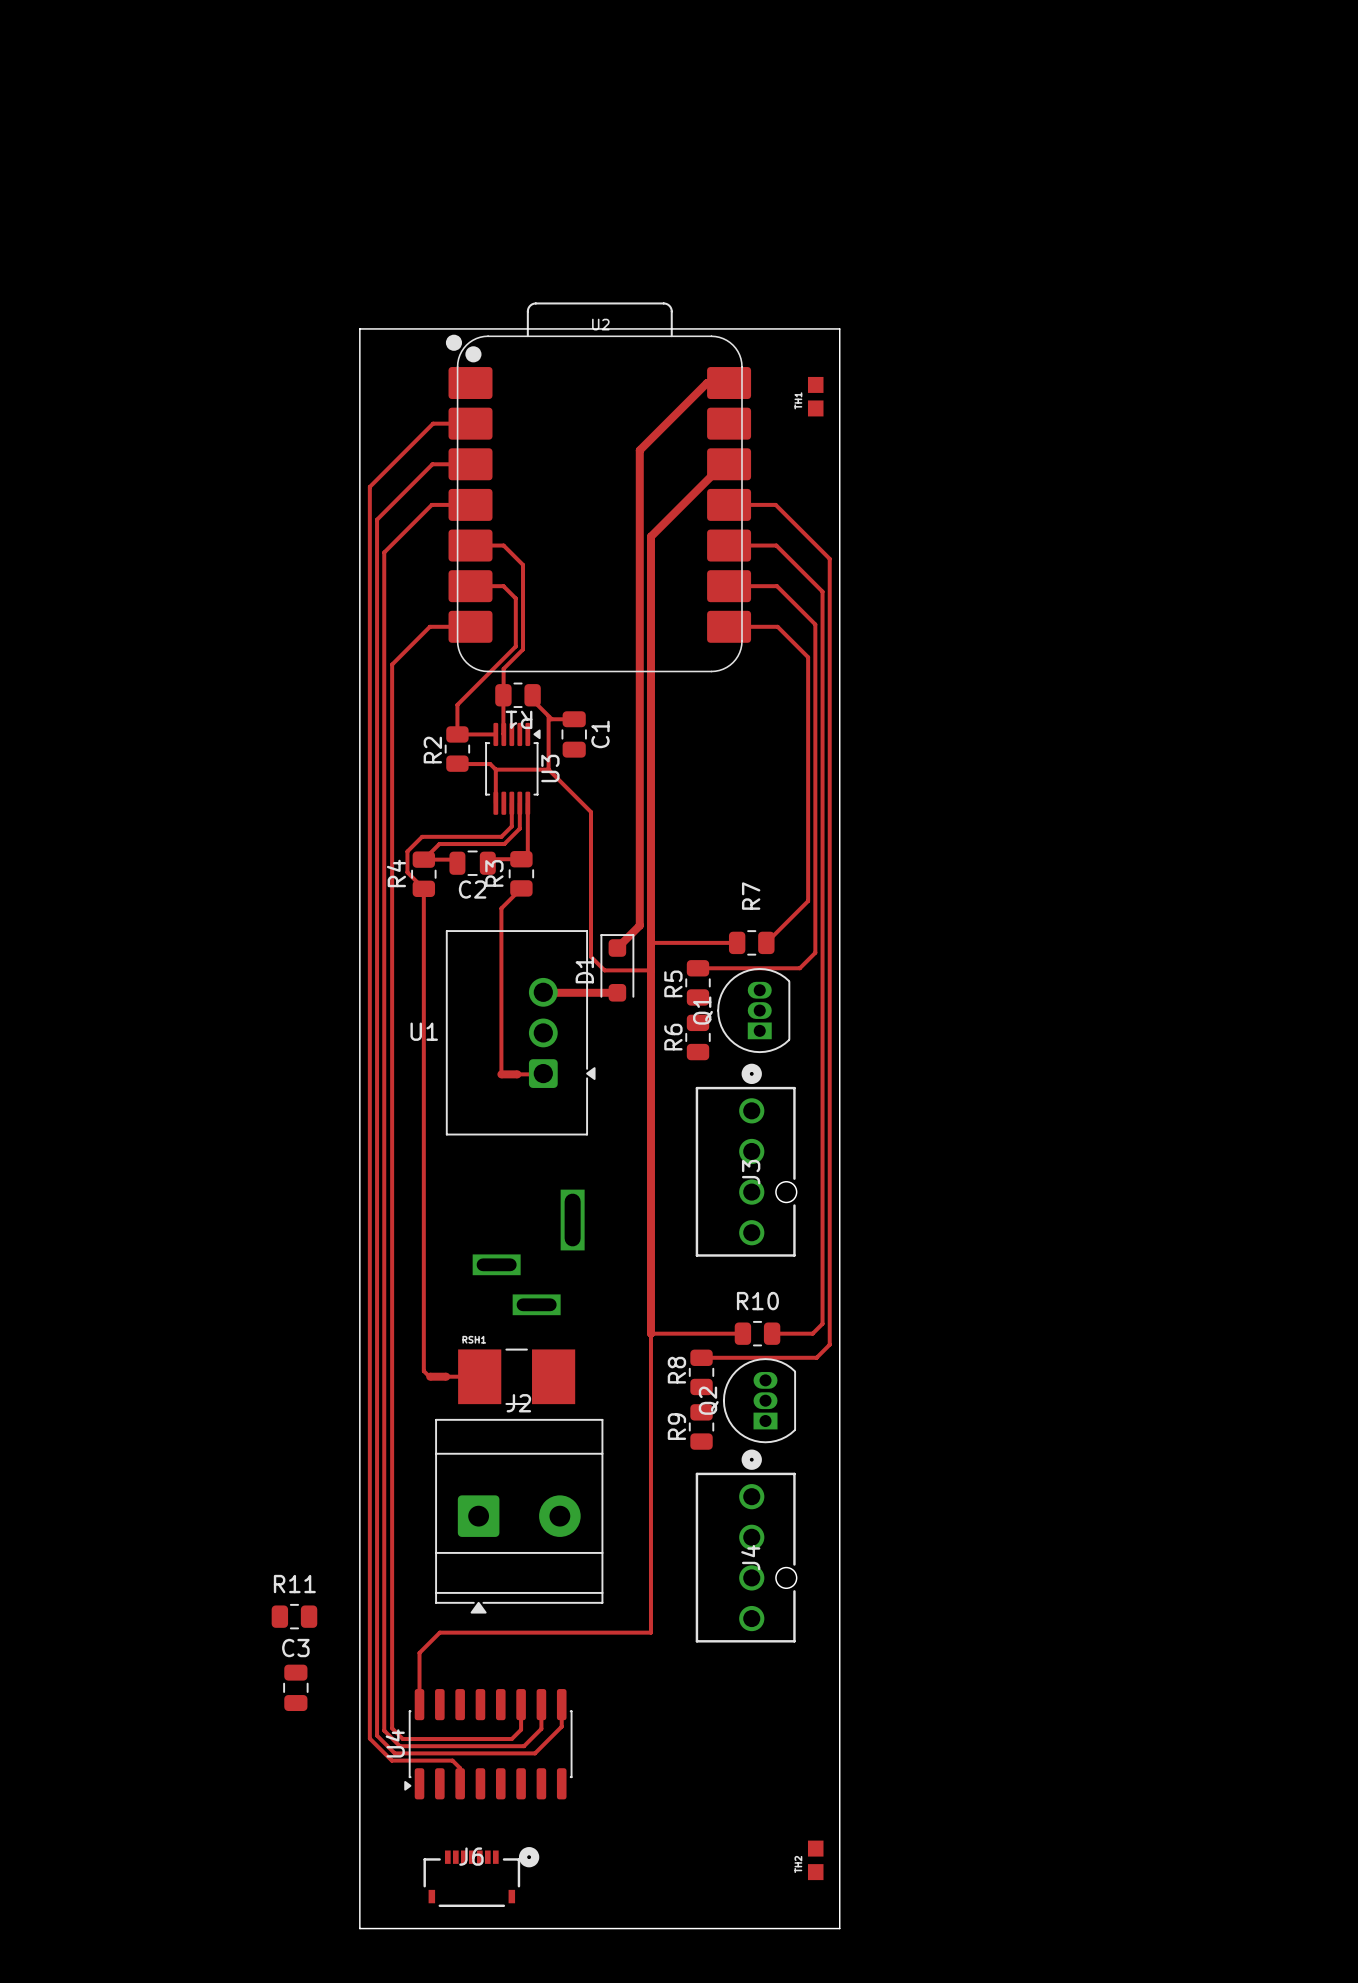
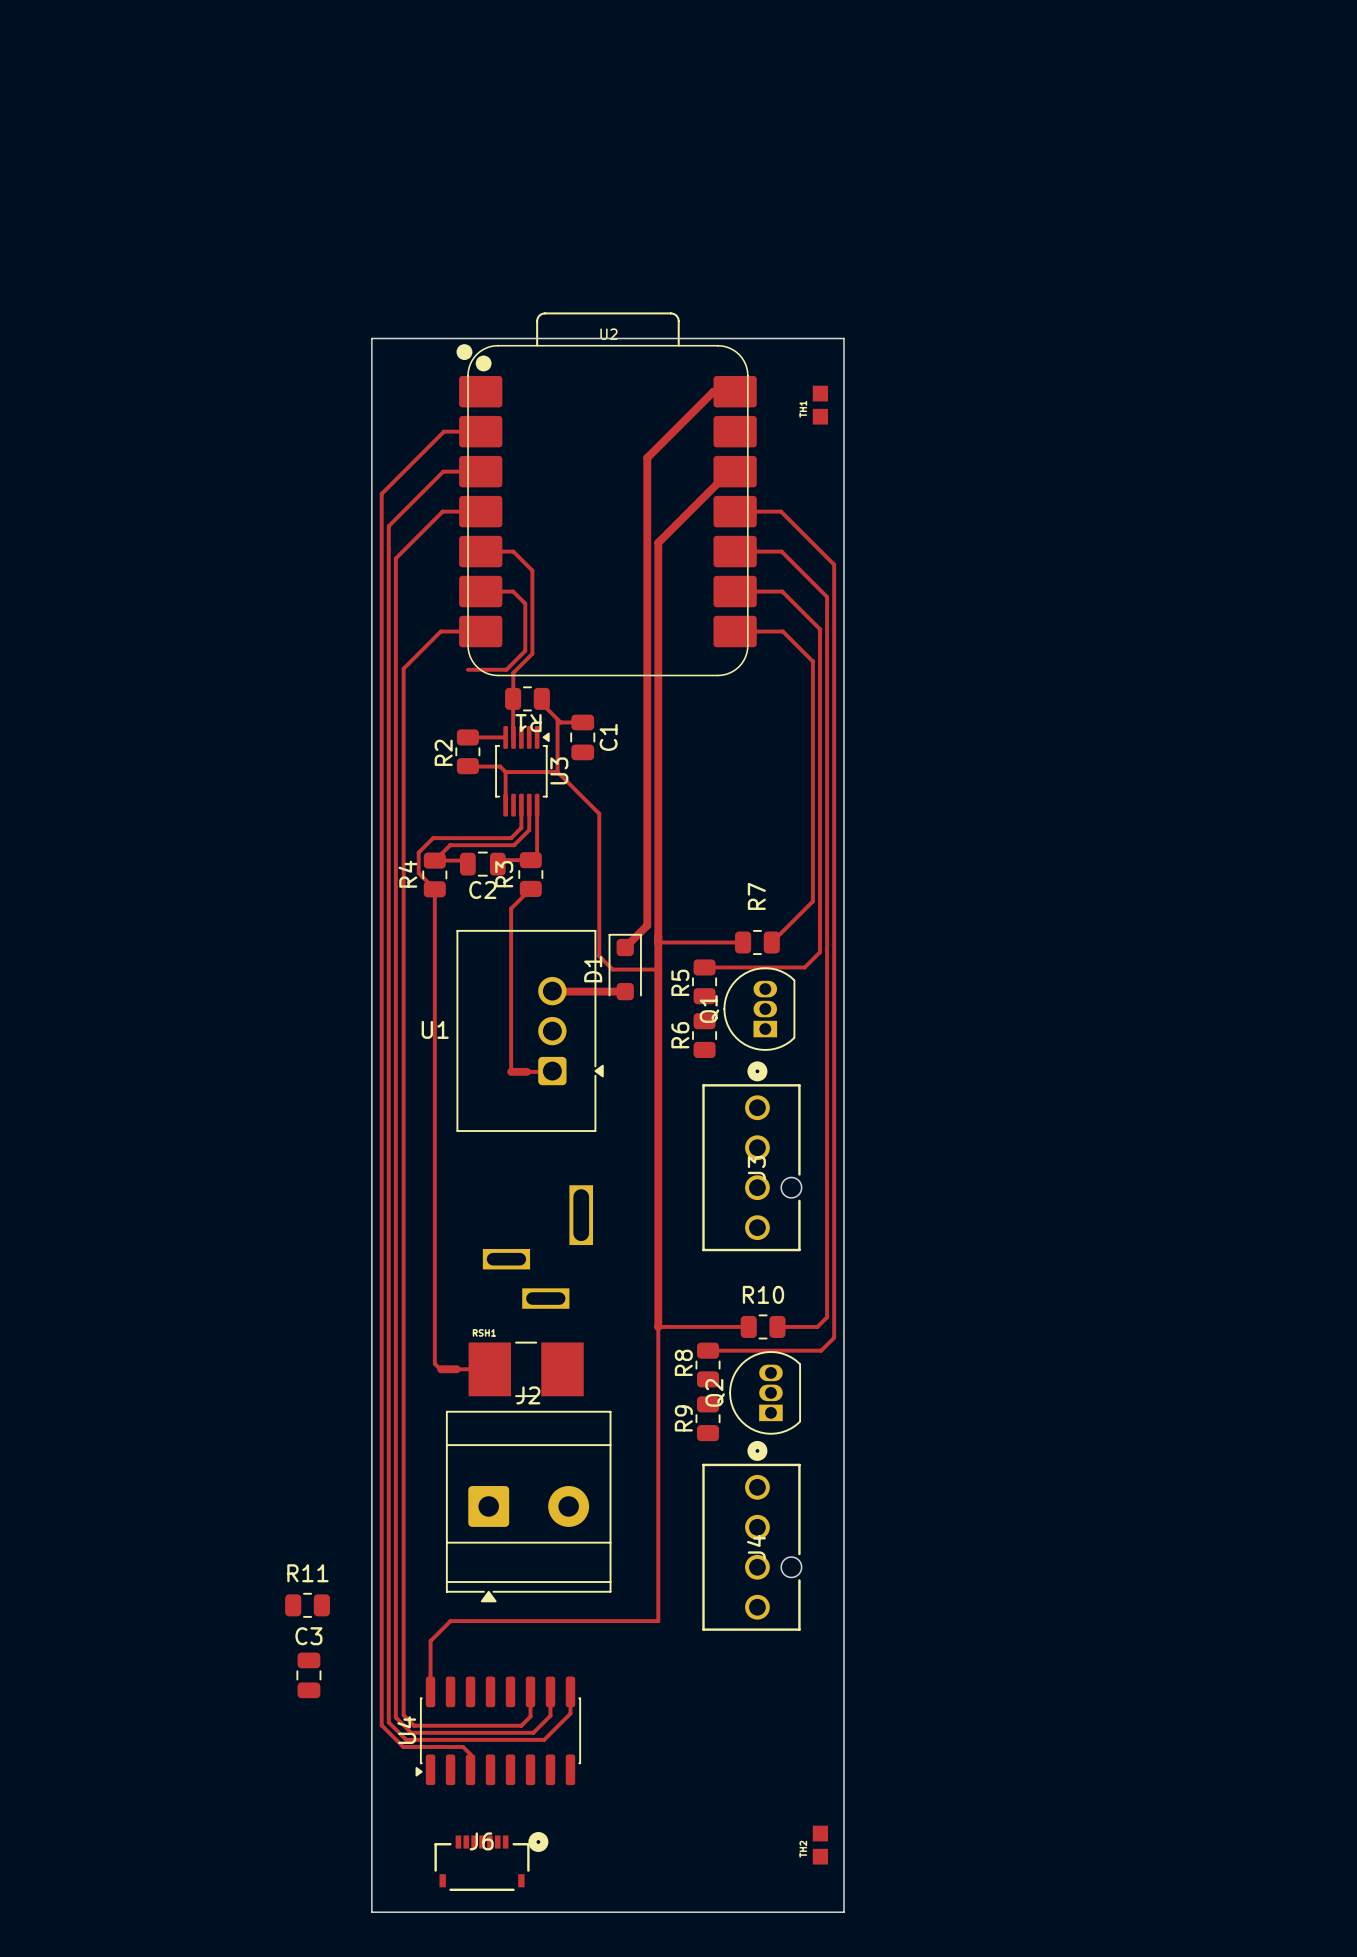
top track: (496, 665) (457, 704) (457, 734) -> (506, 669) (467, 669)

